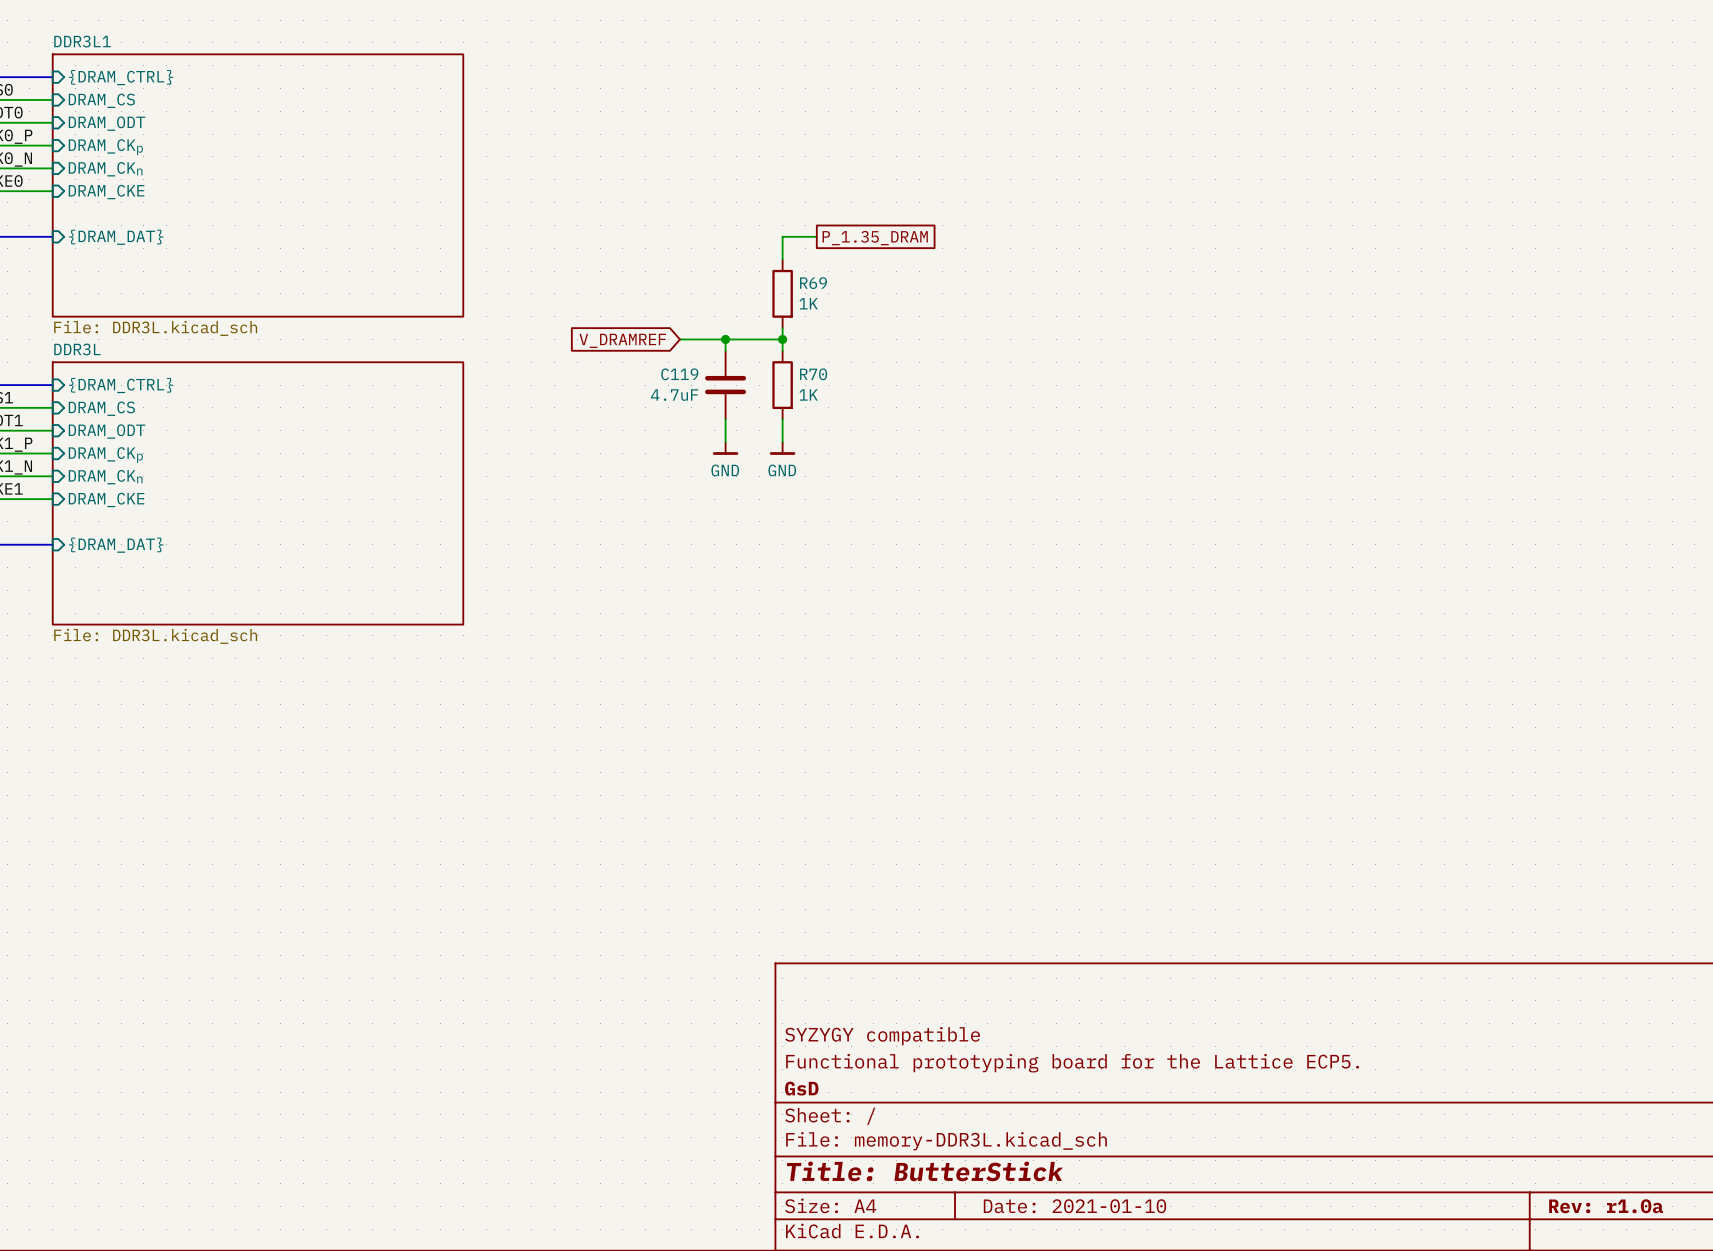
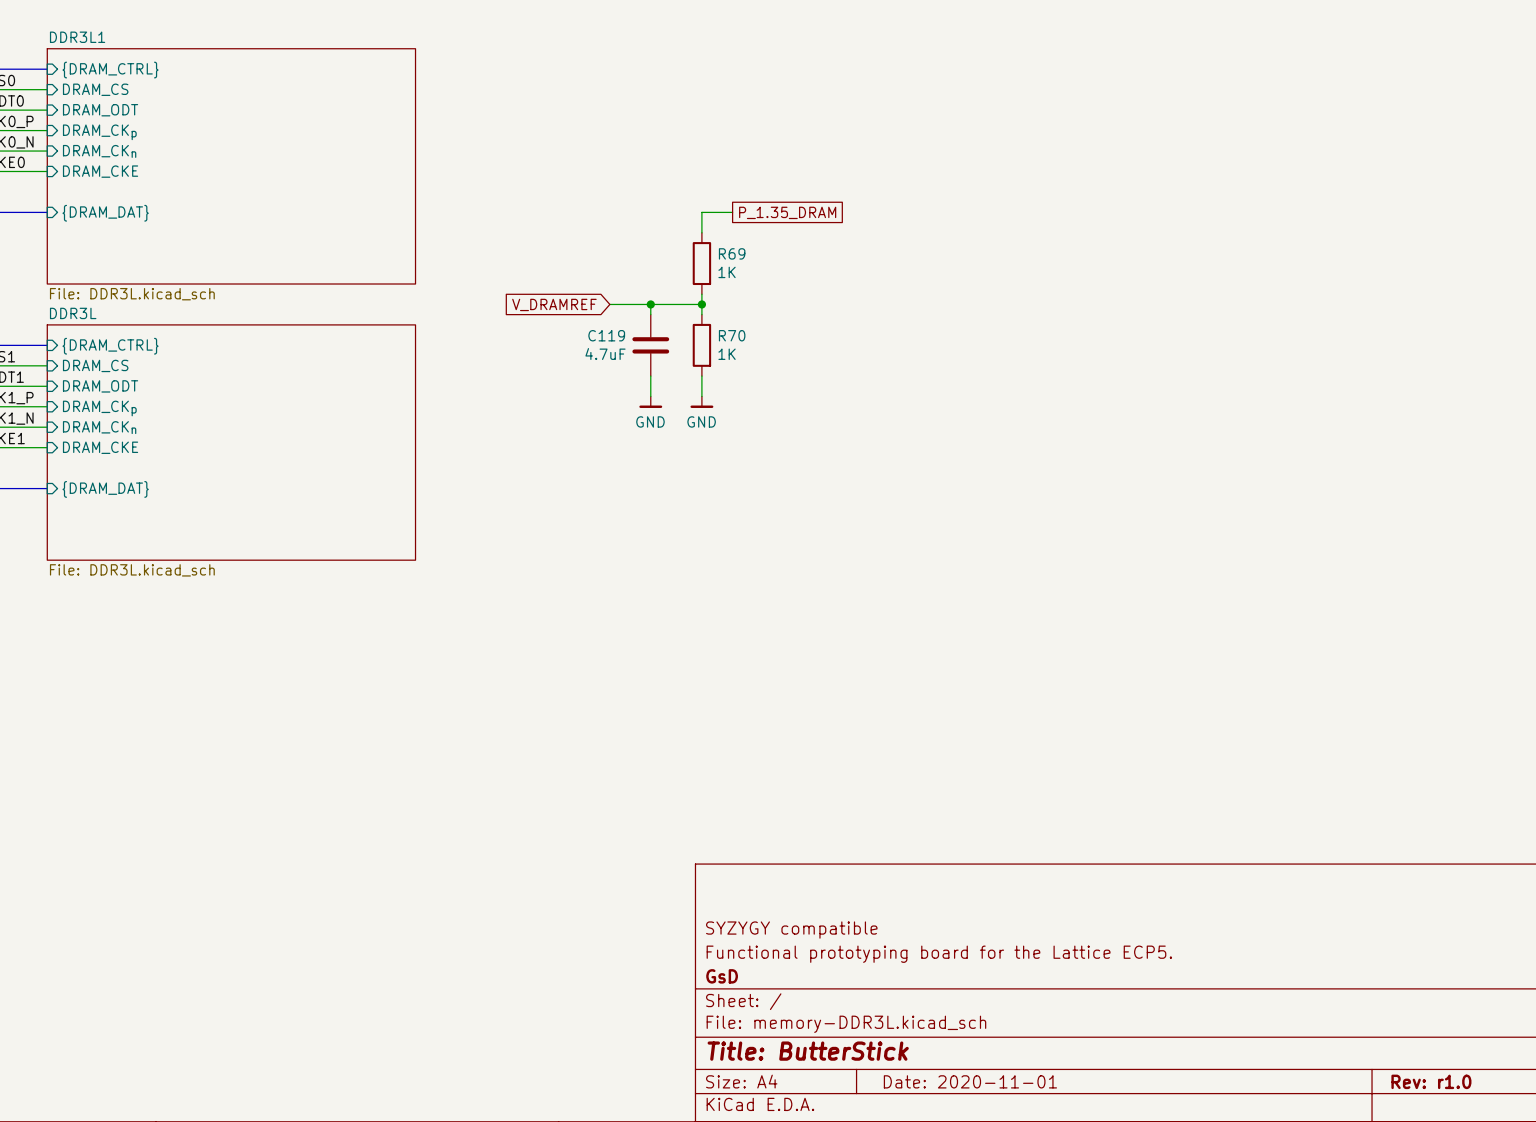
title block: Date: 2021-01-10 (1074, 1206) -> Date: 2020-11-01 (970, 1081)
title block: Rev: r1.0a (1606, 1206) -> Rev: r1.0 (1431, 1081)

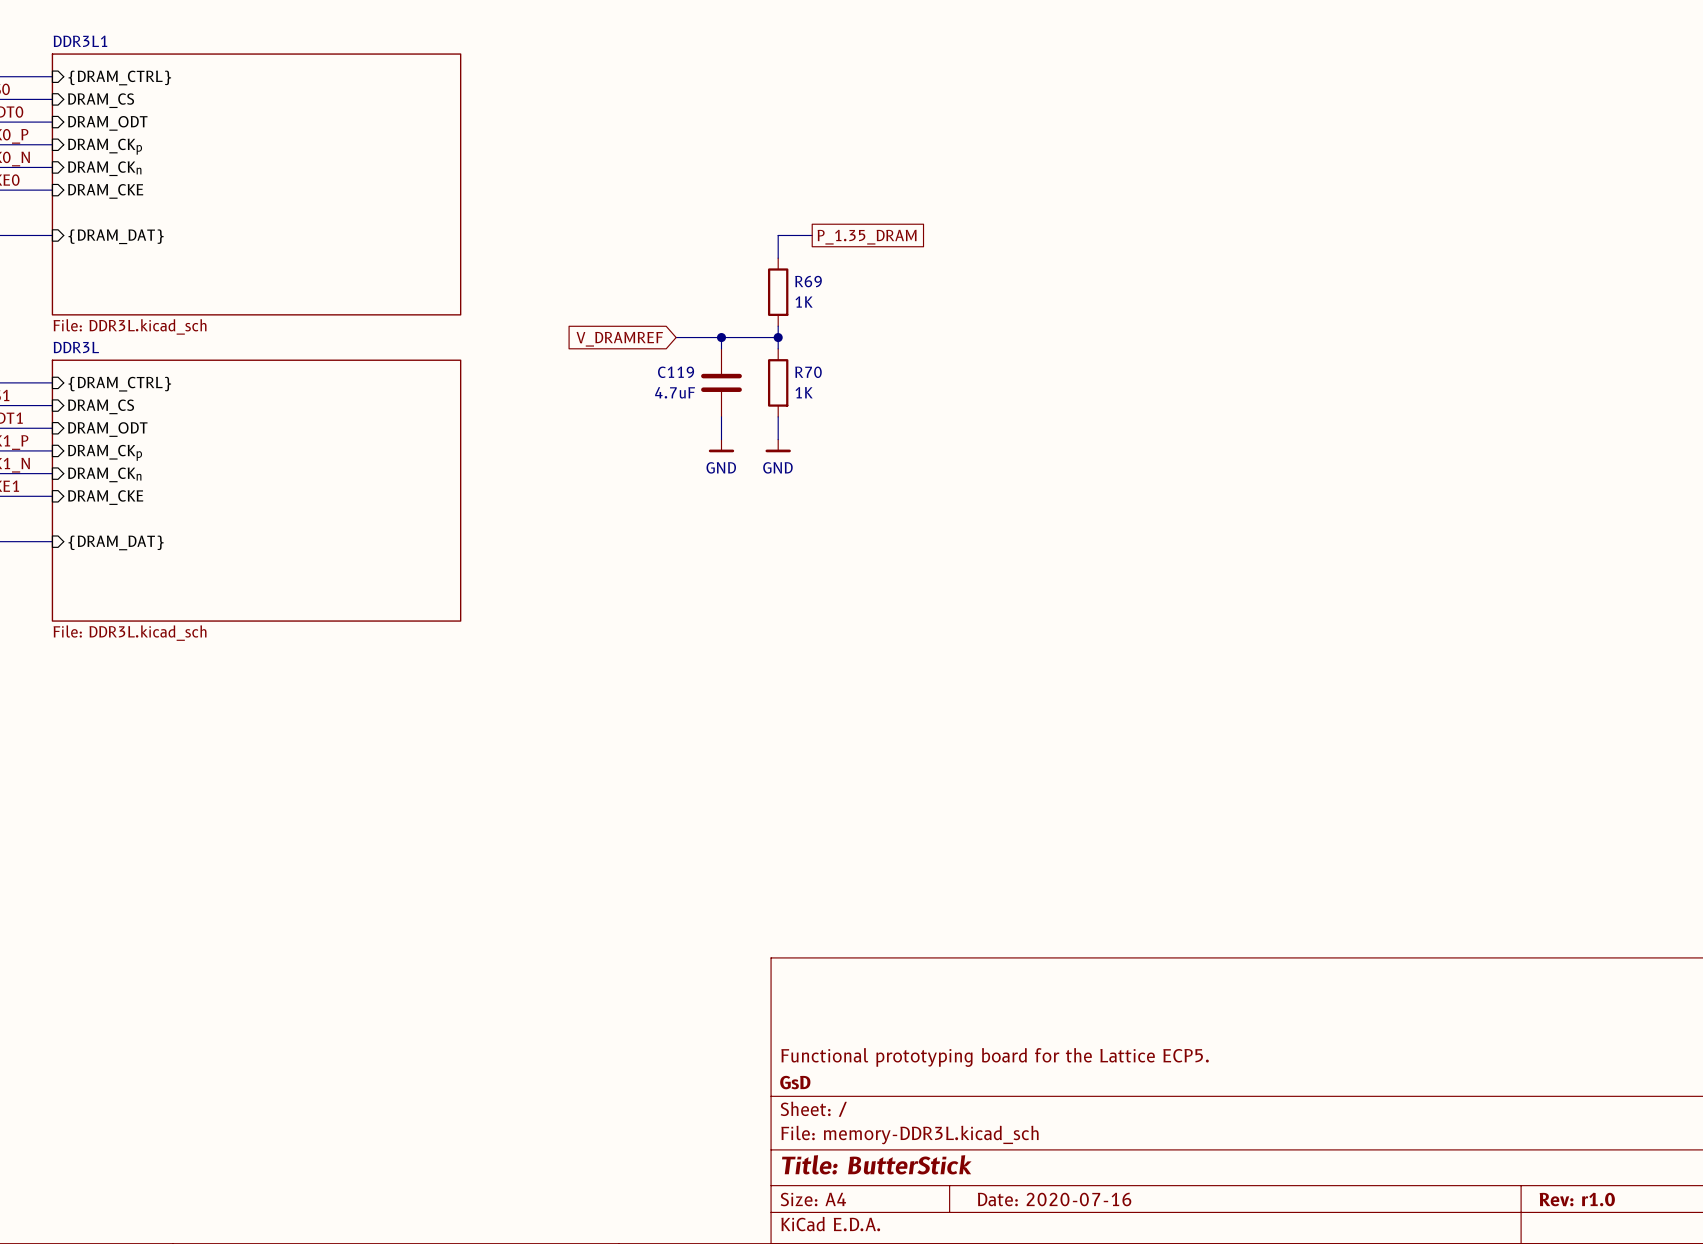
title block: SYZYGY compatible (791, 930) -> none
title block: Date: 2020-11-01 (970, 1081) -> Date: 2020-07-16 (1054, 1199)

